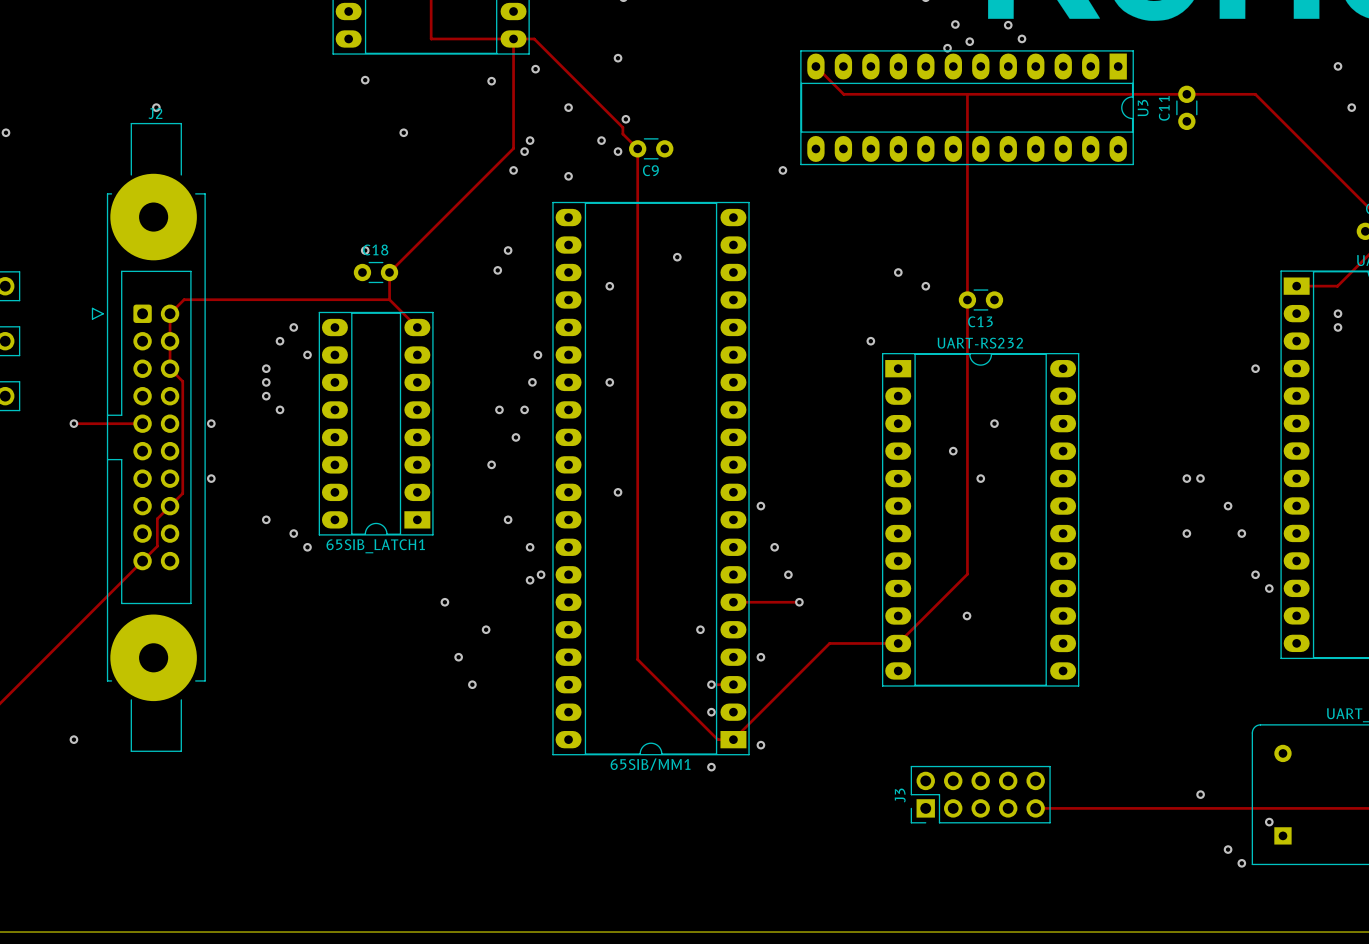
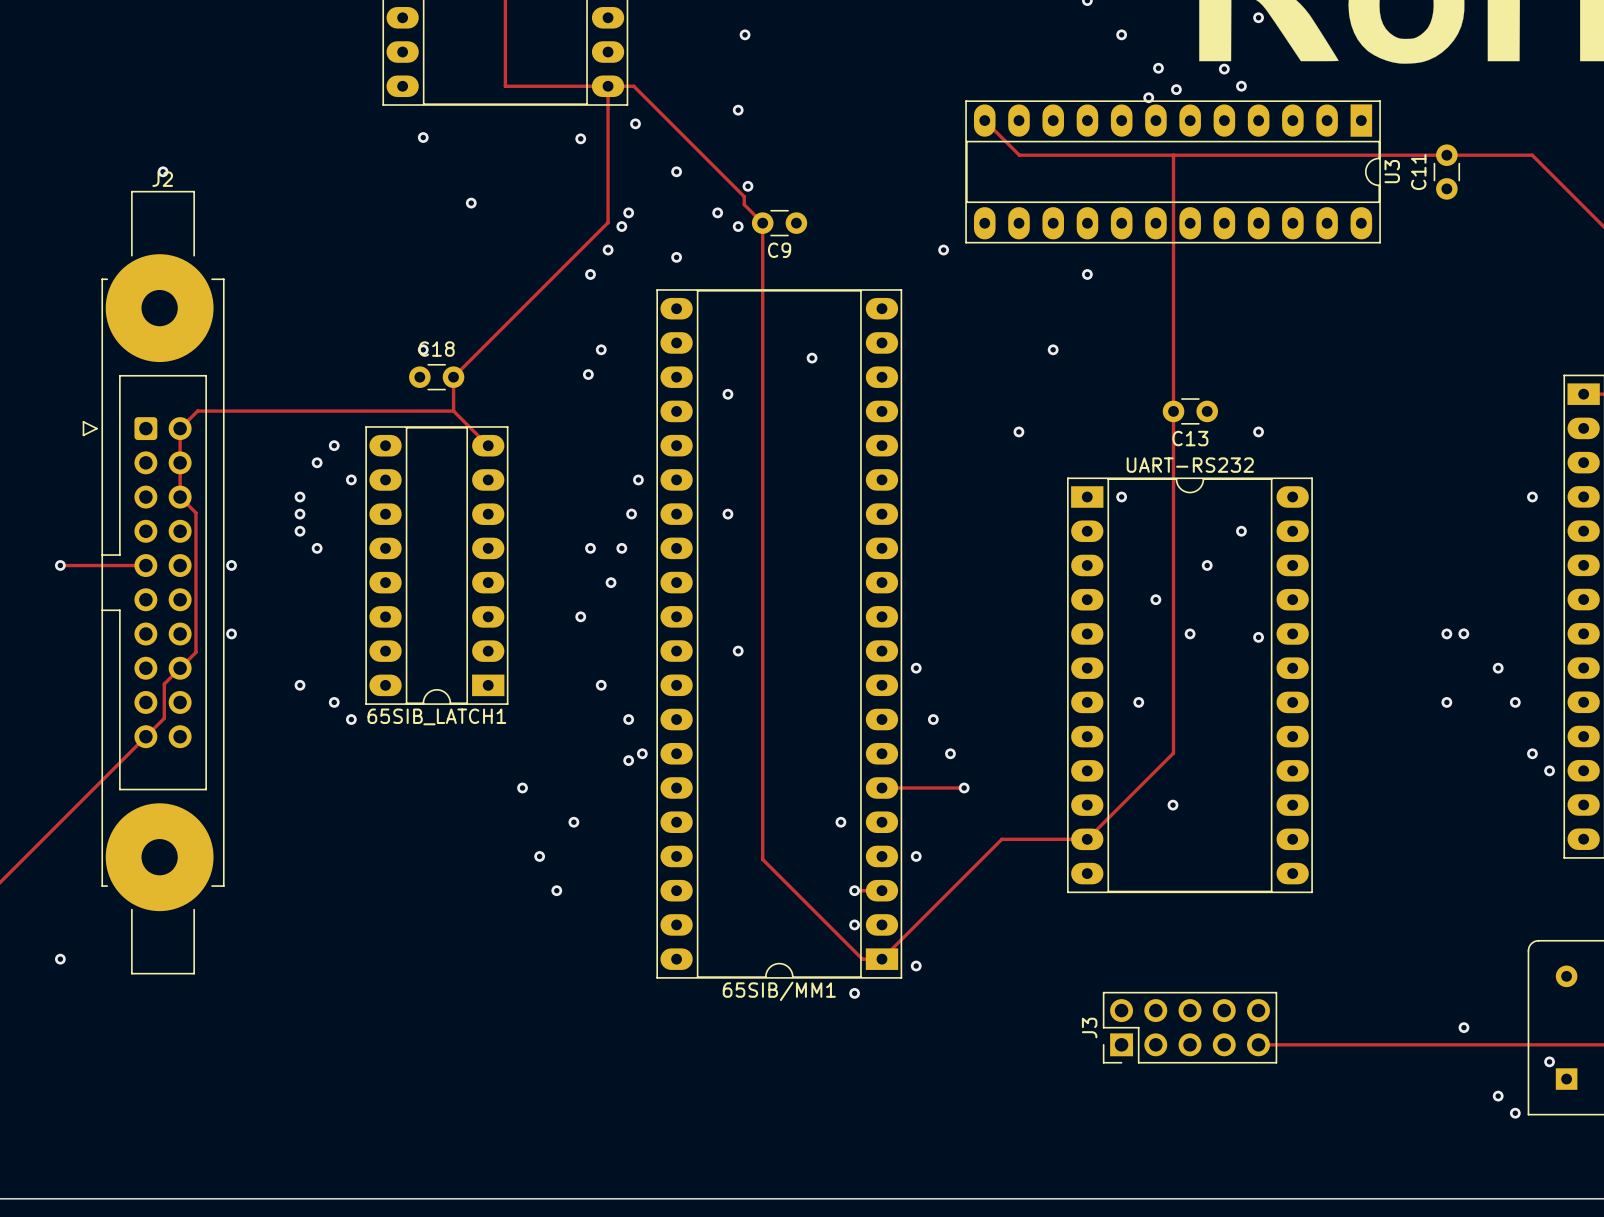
via: none -> (590, 274)
via: none -> (1087, 274)
via: none -> (1053, 349)
via: (898, 272) -> none
via: (925, 286) -> none
via: none -> (1018, 431)
via: none -> (1258, 431)
via: (870, 341) -> none
via: none -> (1121, 497)
via: none -> (1241, 531)
via: none -> (1258, 637)
via: none -> (1138, 702)

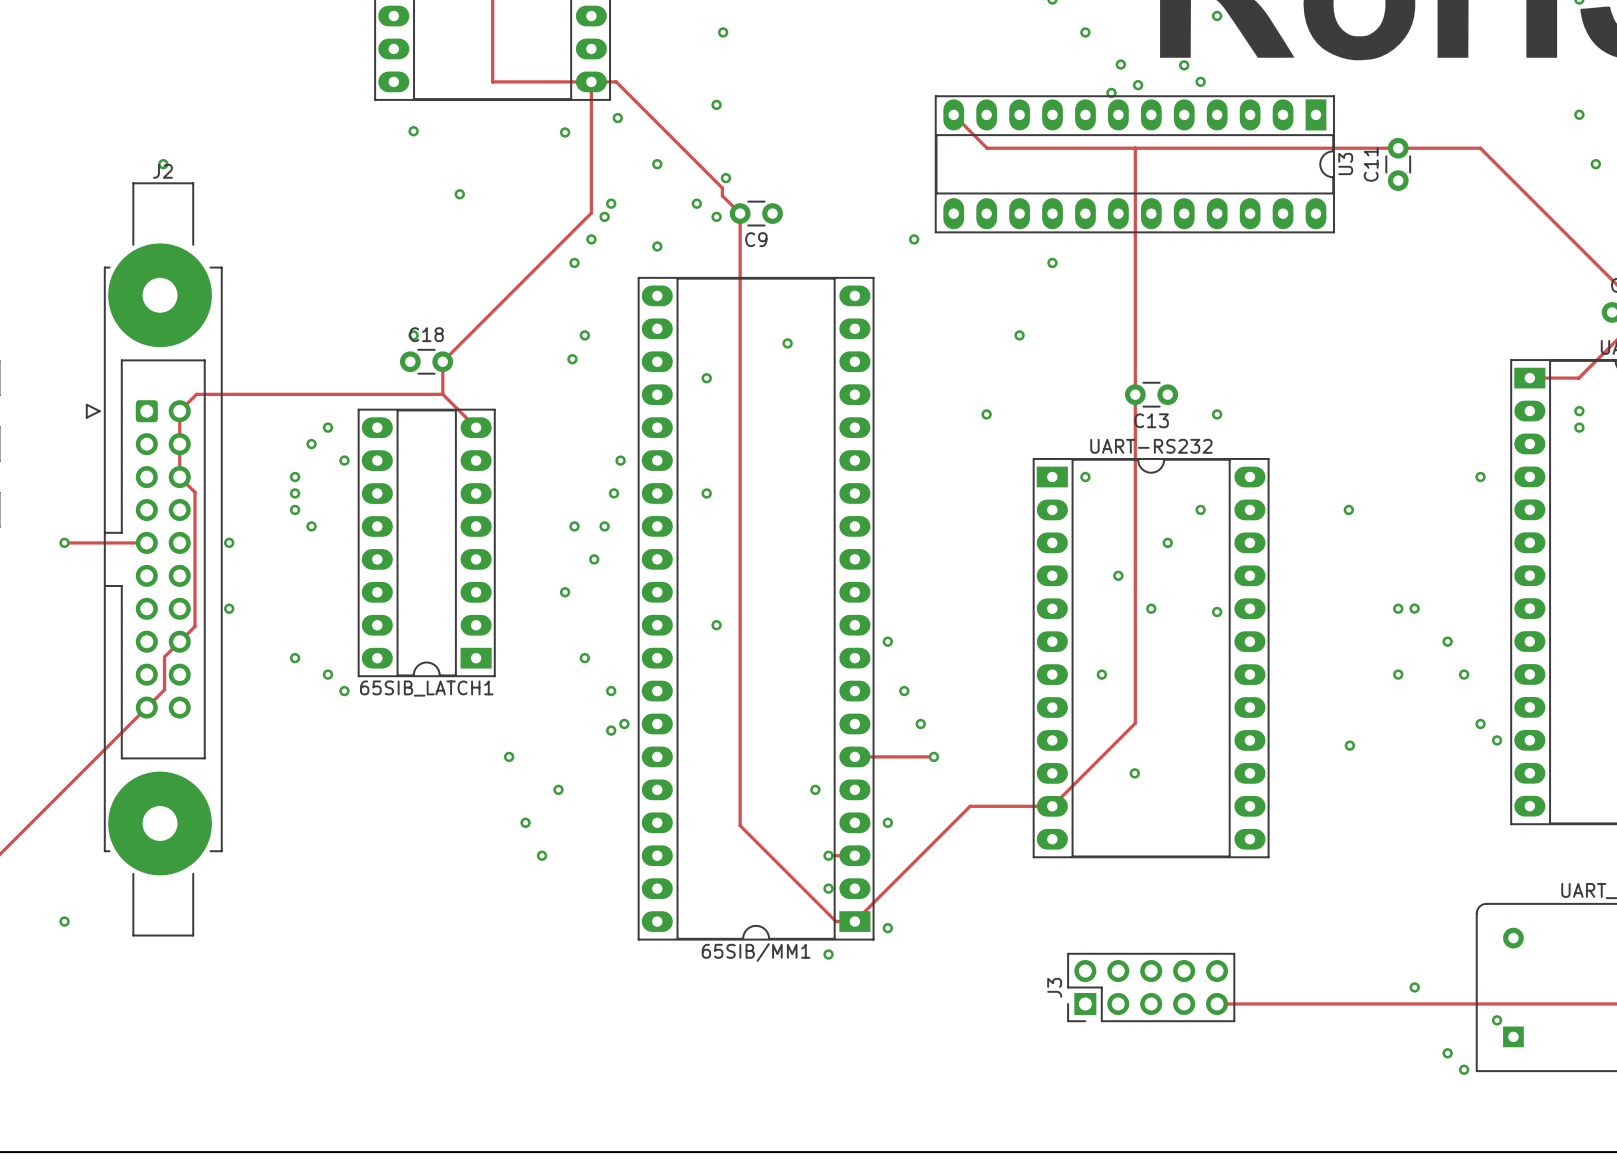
via: none -> (1348, 509)
via: none -> (1349, 745)

